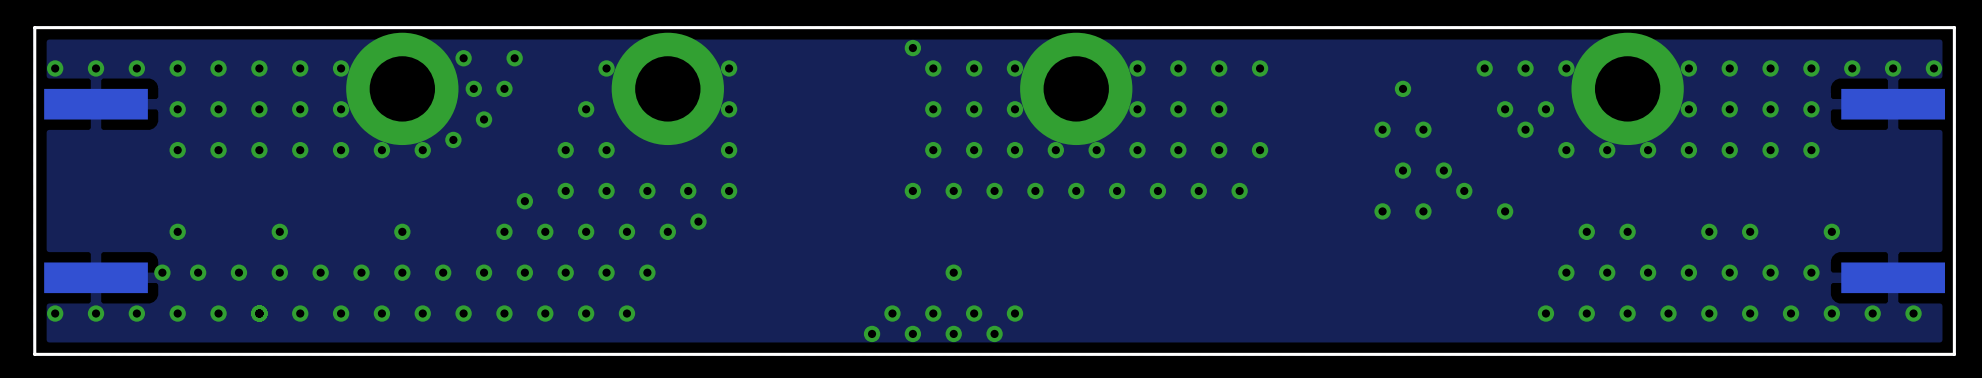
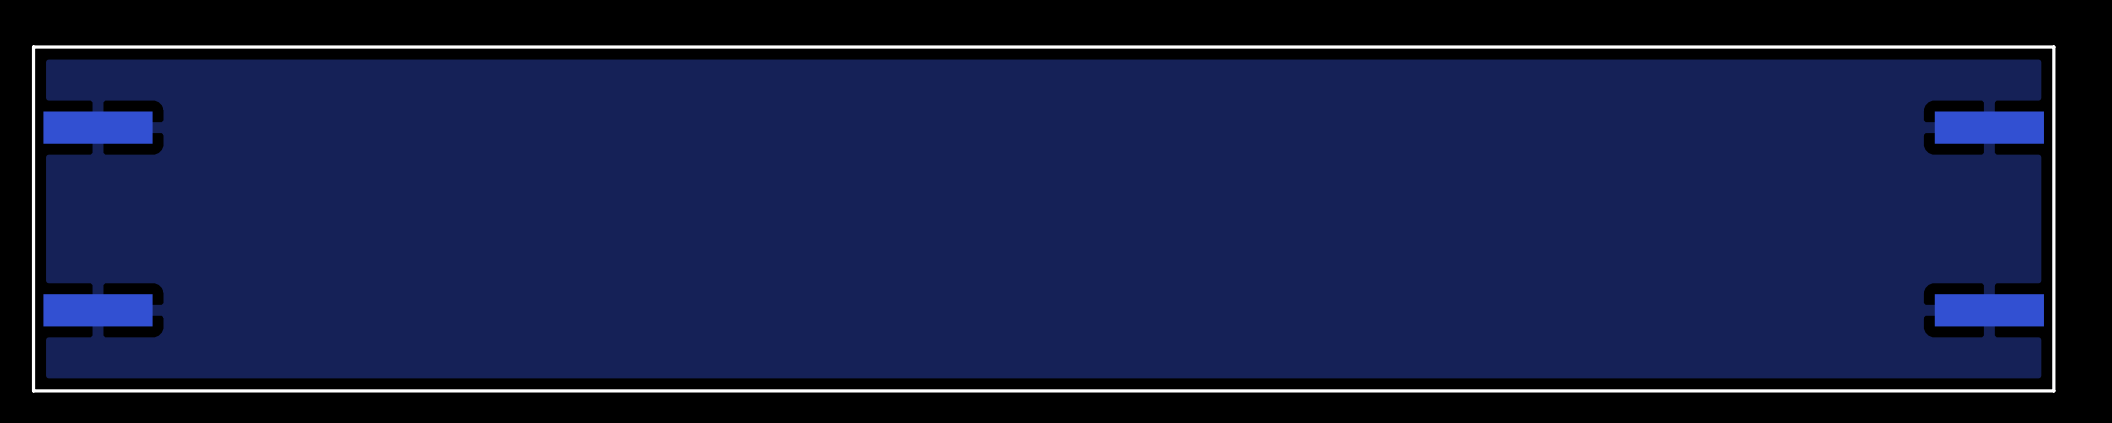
via: (912, 48) -> none
via: (463, 58) -> none
via: (514, 58) -> none
via: (55, 68) -> none
via: (96, 68) -> none
via: (136, 68) -> none
via: (177, 68) -> none
via: (218, 68) -> none
via: (259, 68) -> none
via: (300, 68) -> none
via: (341, 68) -> none
via: (606, 68) -> none
via: (729, 68) -> none
via: (933, 68) -> none
via: (974, 68) -> none
via: (1014, 68) -> none
via: (1137, 68) -> none
via: (1178, 68) -> none
via: (1219, 68) -> none
via: (1260, 68) -> none
via: (1484, 68) -> none
via: (1525, 68) -> none
via: (1566, 68) -> none
via: (1688, 68) -> none
via: (1729, 68) -> none
via: (1770, 68) -> none
via: (1811, 68) -> none
via: (1852, 68) -> none
via: (1893, 68) -> none
via: (1933, 68) -> none
part: (402, 88) -> none
via: (473, 88) -> none
via: (504, 88) -> none
part: (667, 88) -> none
part: (1076, 88) -> none
via: (1403, 88) -> none
part: (1627, 88) -> none
via: (177, 109) -> none
via: (218, 109) -> none
via: (259, 109) -> none
via: (300, 109) -> none
via: (341, 109) -> none
via: (586, 109) -> none
via: (729, 109) -> none
via: (933, 109) -> none
via: (974, 109) -> none
via: (1014, 109) -> none
via: (1137, 109) -> none
via: (1178, 109) -> none
via: (1219, 109) -> none
via: (1505, 109) -> none
via: (1545, 109) -> none
via: (1688, 109) -> none
via: (1729, 109) -> none
via: (1770, 109) -> none
via: (1811, 109) -> none
via: (484, 119) -> none
via: (1382, 129) -> none
via: (1423, 129) -> none
via: (1525, 129) -> none
via: (453, 139) -> none
via: (177, 150) -> none
via: (218, 150) -> none
via: (259, 150) -> none
via: (300, 150) -> none
via: (341, 150) -> none
via: (381, 150) -> none
via: (422, 150) -> none
via: (565, 150) -> none
via: (606, 150) -> none
via: (729, 150) -> none
via: (933, 150) -> none
via: (974, 150) -> none
via: (1014, 150) -> none
via: (1055, 150) -> none
via: (1096, 150) -> none
via: (1137, 150) -> none
via: (1178, 150) -> none
via: (1219, 150) -> none
via: (1260, 150) -> none
via: (1566, 150) -> none
via: (1607, 150) -> none
via: (1648, 150) -> none
via: (1688, 150) -> none
via: (1729, 150) -> none
via: (1770, 150) -> none
via: (1811, 150) -> none
via: (1403, 170) -> none
via: (1443, 170) -> none
via: (565, 191) -> none
via: (606, 191) -> none
via: (647, 191) -> none
via: (688, 191) -> none
via: (729, 191) -> none
via: (912, 191) -> none
via: (953, 191) -> none
via: (994, 191) -> none
via: (1035, 191) -> none
via: (1076, 191) -> none
via: (1117, 191) -> none
via: (1157, 191) -> none
via: (1198, 191) -> none
via: (1239, 191) -> none
via: (1464, 191) -> none
via: (524, 201) -> none
via: (1382, 211) -> none
via: (1423, 211) -> none
via: (1505, 211) -> none
via: (698, 221) -> none
via: (177, 231) -> none
via: (279, 231) -> none
via: (402, 231) -> none
via: (504, 231) -> none
via: (545, 231) -> none
via: (586, 231) -> none
via: (626, 231) -> none
via: (667, 231) -> none
via: (1586, 231) -> none
via: (1627, 231) -> none
via: (1709, 231) -> none
via: (1750, 231) -> none
via: (1831, 231) -> none
via: (162, 272) -> none
via: (198, 272) -> none
via: (238, 272) -> none
via: (279, 272) -> none
via: (320, 272) -> none
via: (361, 272) -> none
via: (402, 272) -> none
via: (443, 272) -> none
via: (484, 272) -> none
via: (524, 272) -> none
via: (565, 272) -> none
via: (606, 272) -> none
via: (647, 272) -> none
via: (953, 272) -> none
via: (1566, 272) -> none
via: (1607, 272) -> none
via: (1648, 272) -> none
via: (1688, 272) -> none
via: (1729, 272) -> none
via: (1770, 272) -> none
via: (1811, 272) -> none
via: (55, 313) -> none
via: (96, 313) -> none
via: (136, 313) -> none
via: (177, 313) -> none
via: (218, 313) -> none
via: (259, 313) -> none
via: (300, 313) -> none
via: (341, 313) -> none
via: (381, 313) -> none
via: (422, 313) -> none
via: (463, 313) -> none
via: (504, 313) -> none
via: (545, 313) -> none
via: (586, 313) -> none
via: (626, 313) -> none
via: (892, 313) -> none
via: (933, 313) -> none
via: (974, 313) -> none
via: (1014, 313) -> none
via: (1545, 313) -> none
via: (1586, 313) -> none
via: (1627, 313) -> none
via: (1668, 313) -> none
via: (1709, 313) -> none
via: (1750, 313) -> none
via: (1791, 313) -> none
via: (1831, 313) -> none
via: (1872, 313) -> none
via: (1913, 313) -> none
via: (872, 333) -> none
via: (912, 333) -> none
via: (953, 333) -> none
via: (994, 333) -> none

